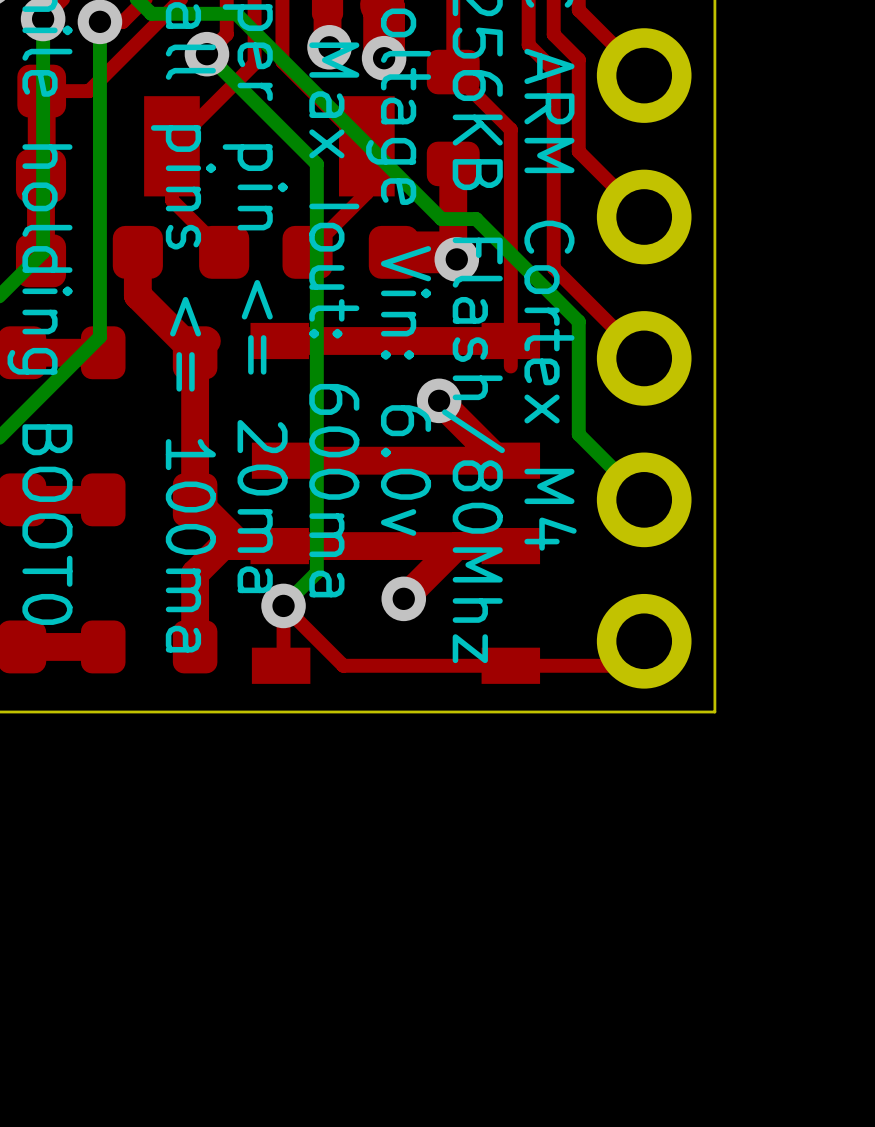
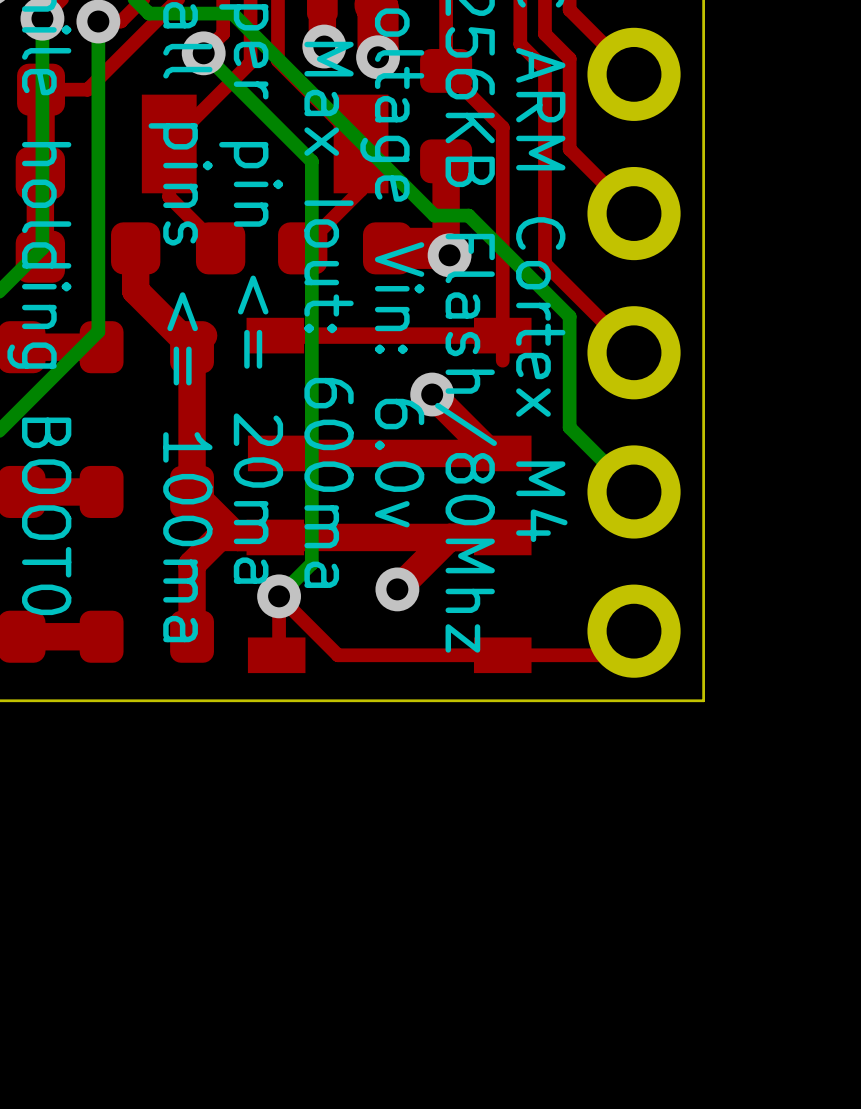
top track width: thick (510, 340) (279, 340) -> thin (502, 335) (275, 335)

